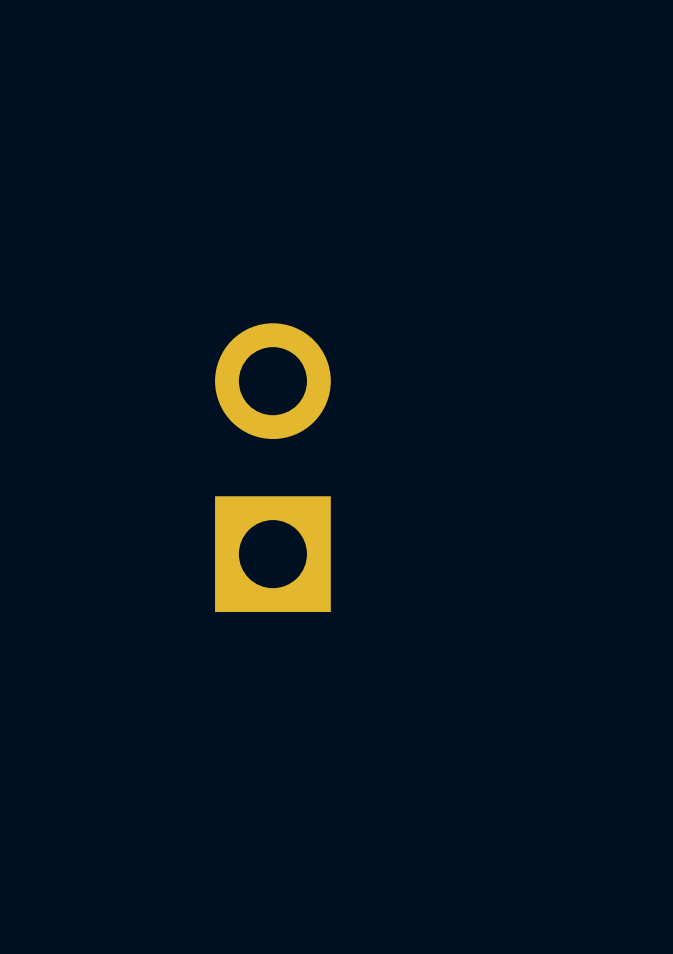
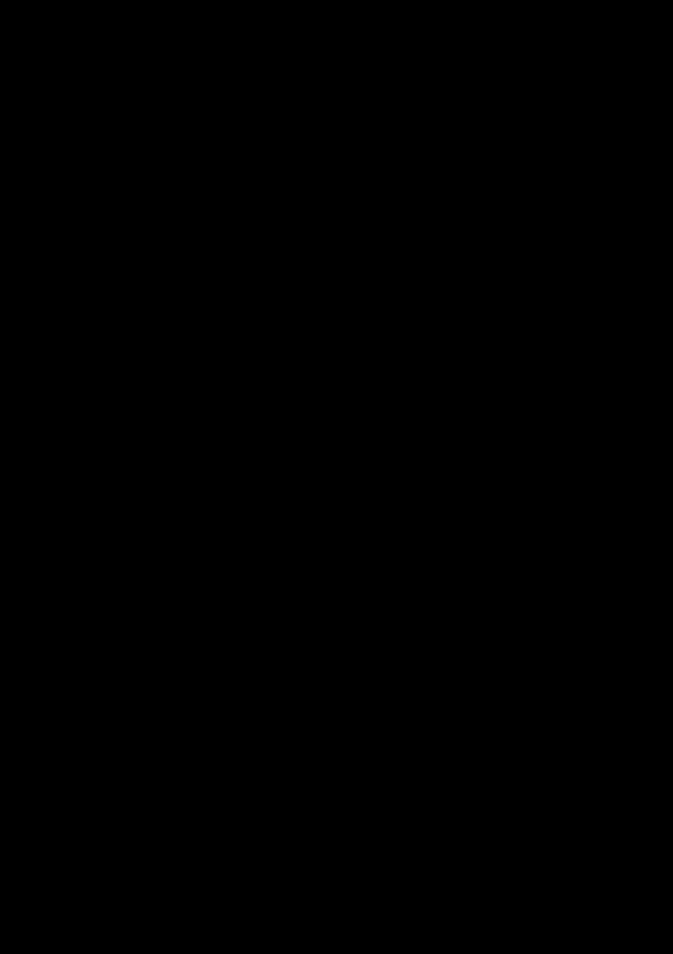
part: (272, 467) -> none

